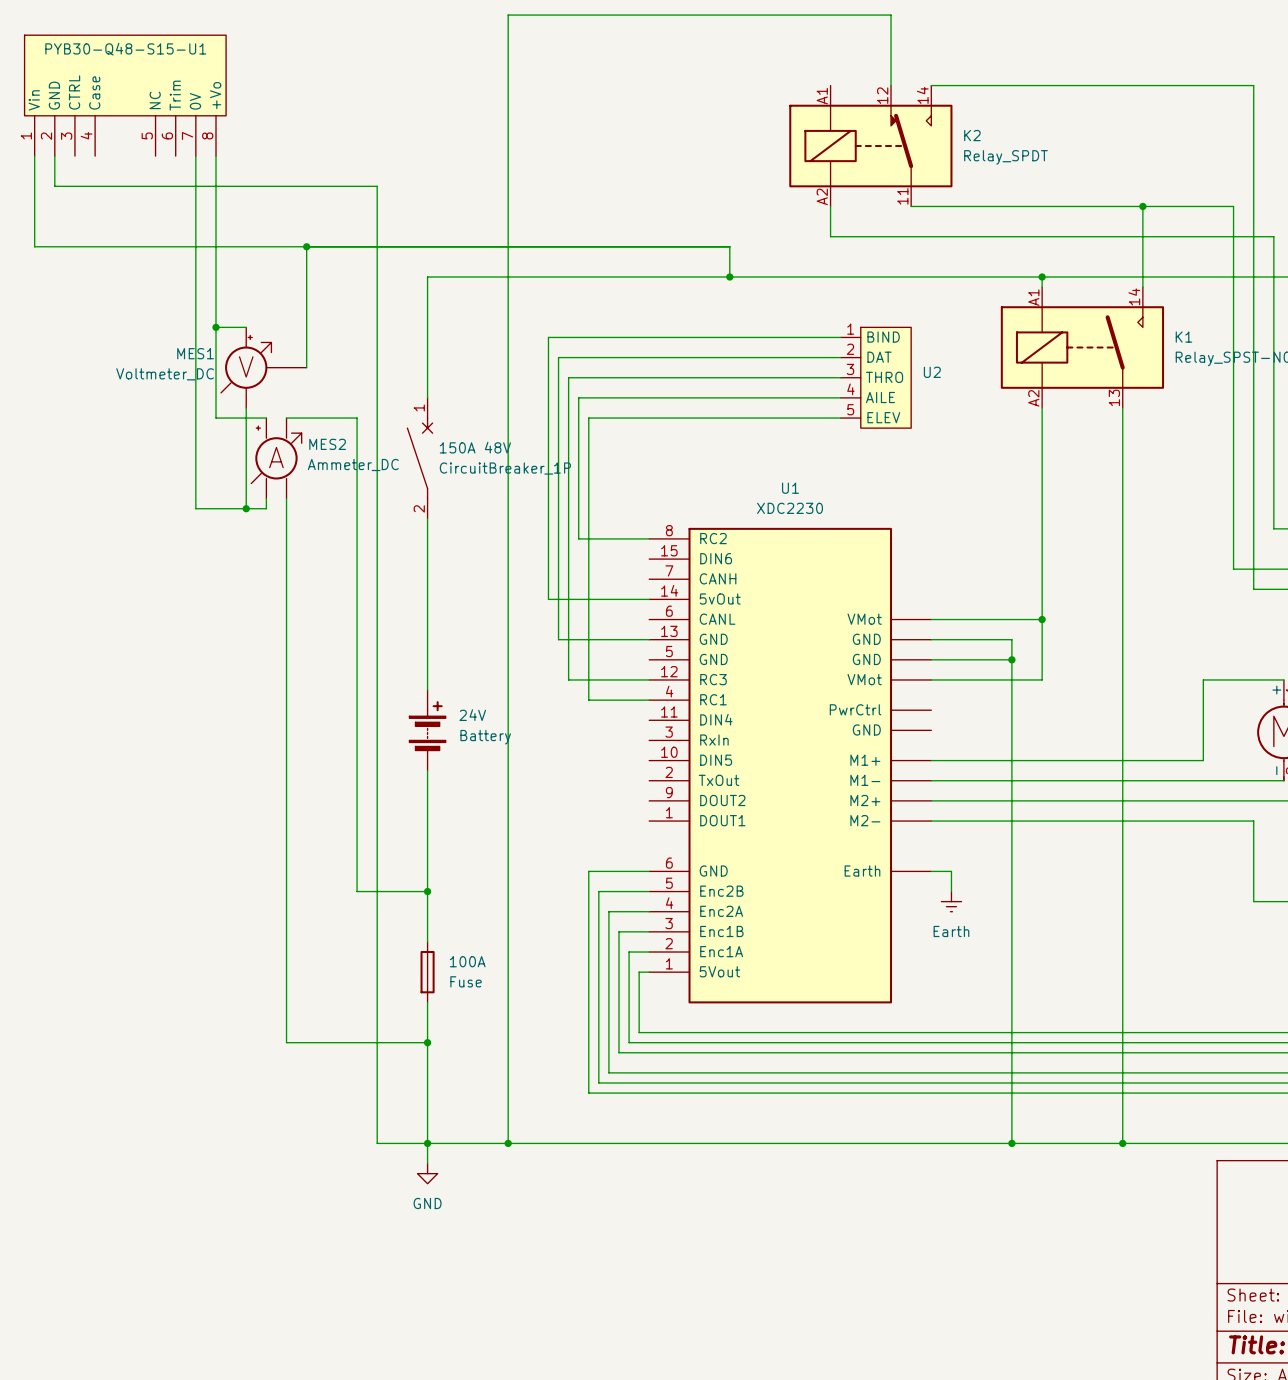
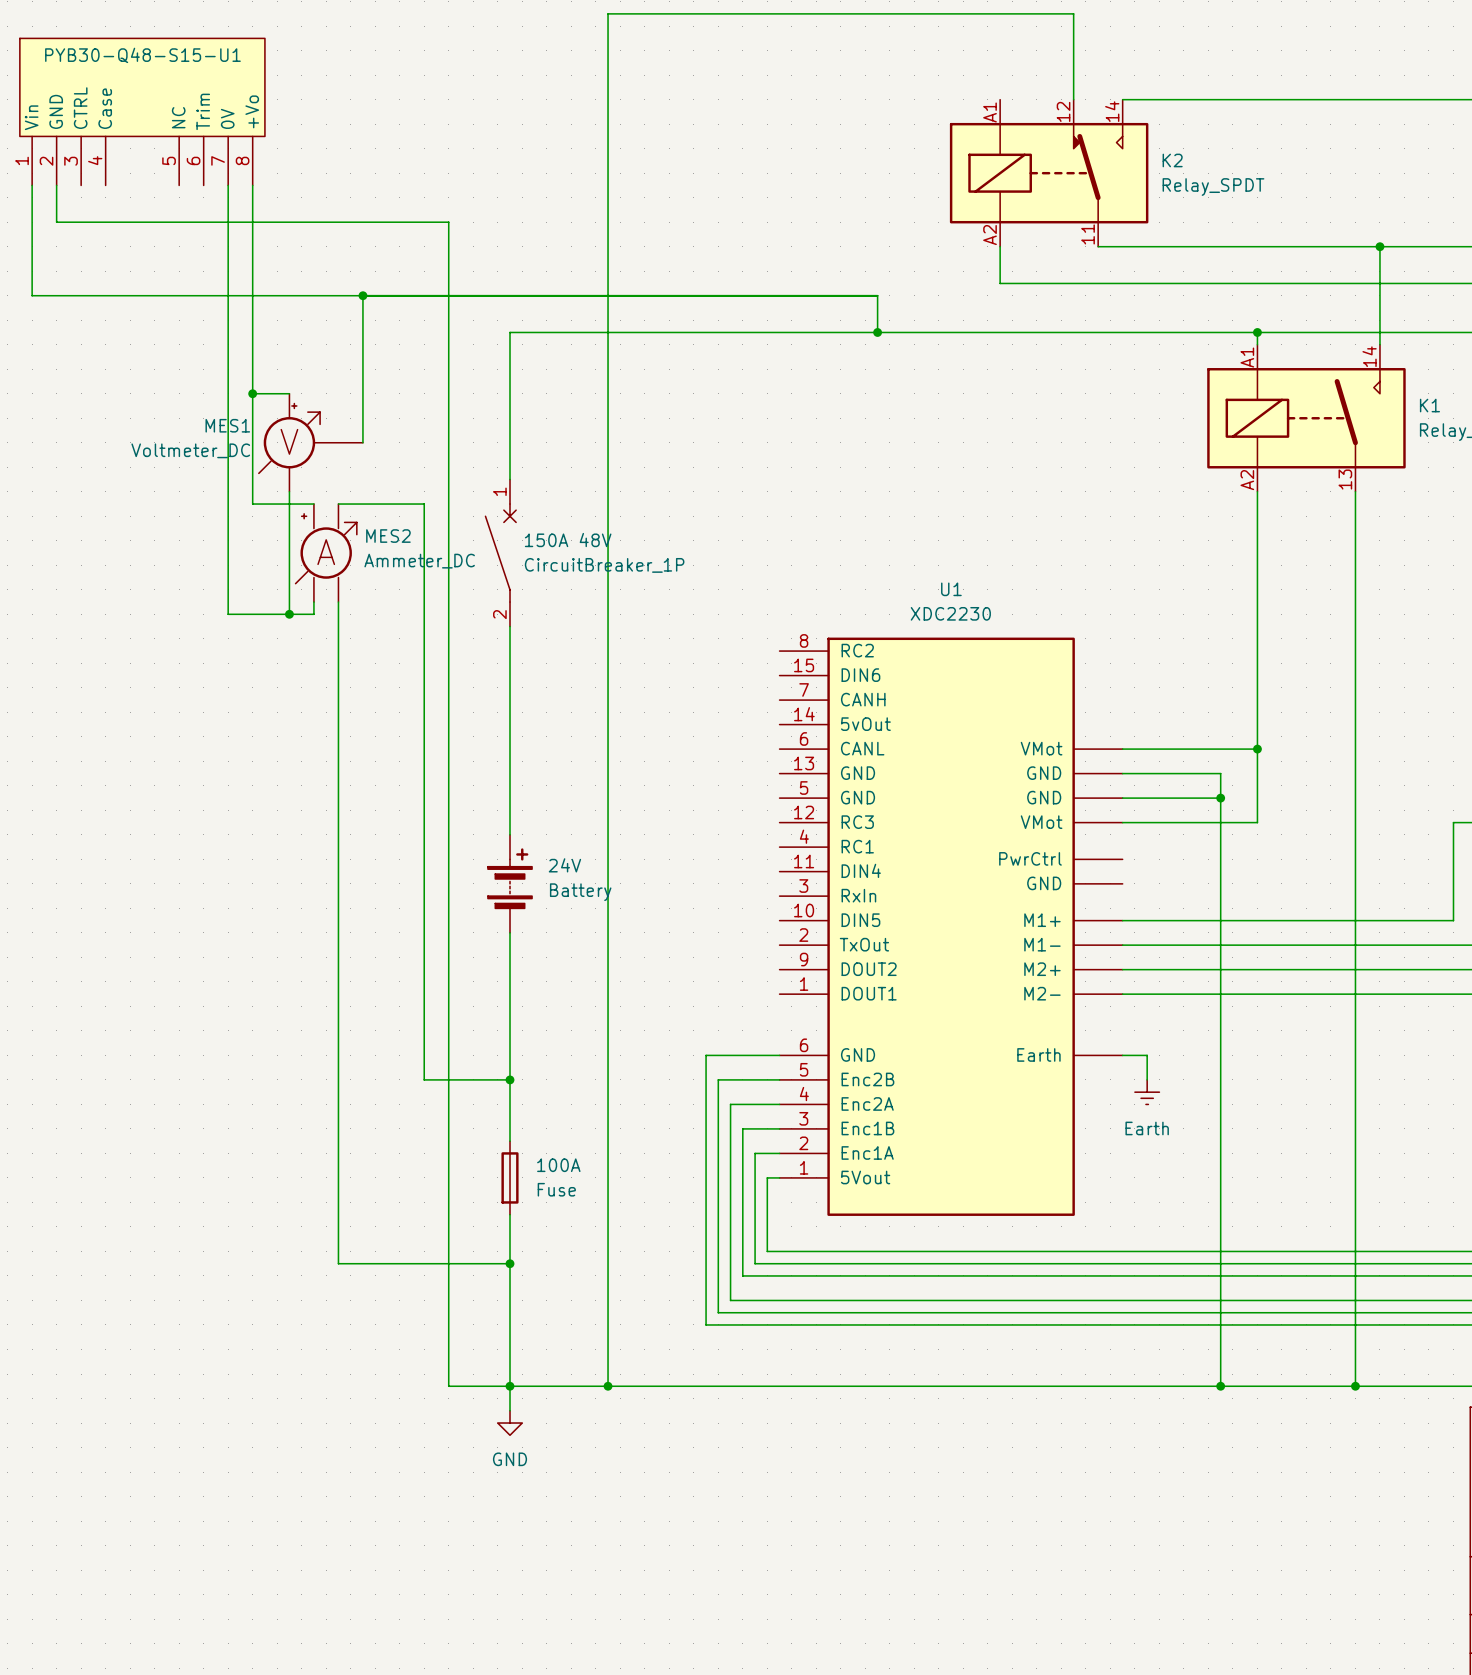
wire: (840, 337) (548, 337) (548, 599) (649, 599) -> none
wire: (840, 357) (558, 357) (558, 639) (649, 639) -> none
wire: (840, 377) (568, 377) (568, 679) (649, 679) -> none
U2: (875, 377) -> none
wire: (840, 397) (578, 397) (578, 538) (649, 538) -> none
wire: (840, 418) (588, 418) (588, 700) (649, 700) -> none

